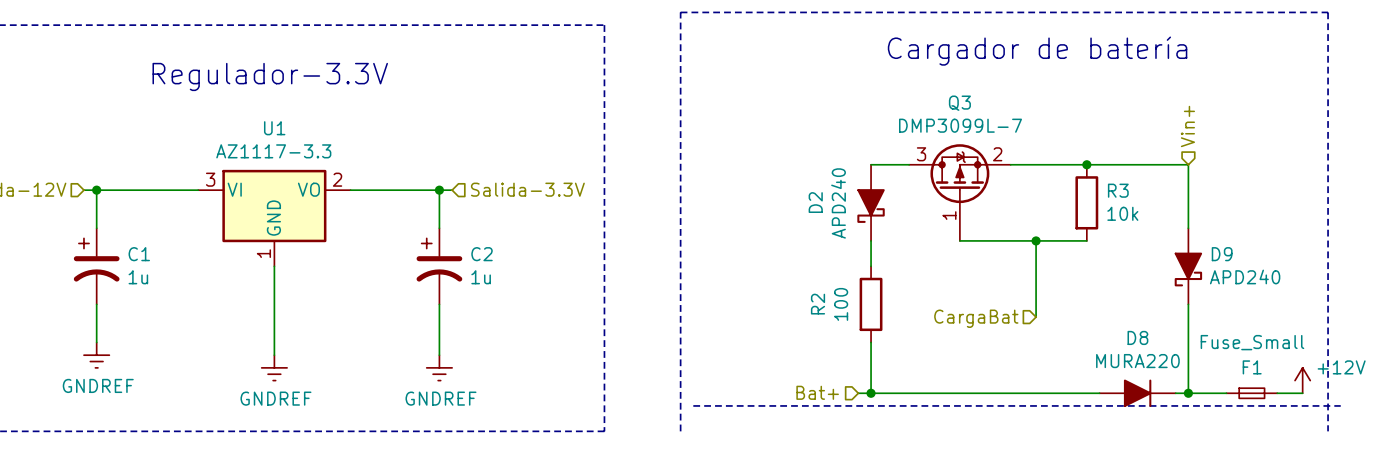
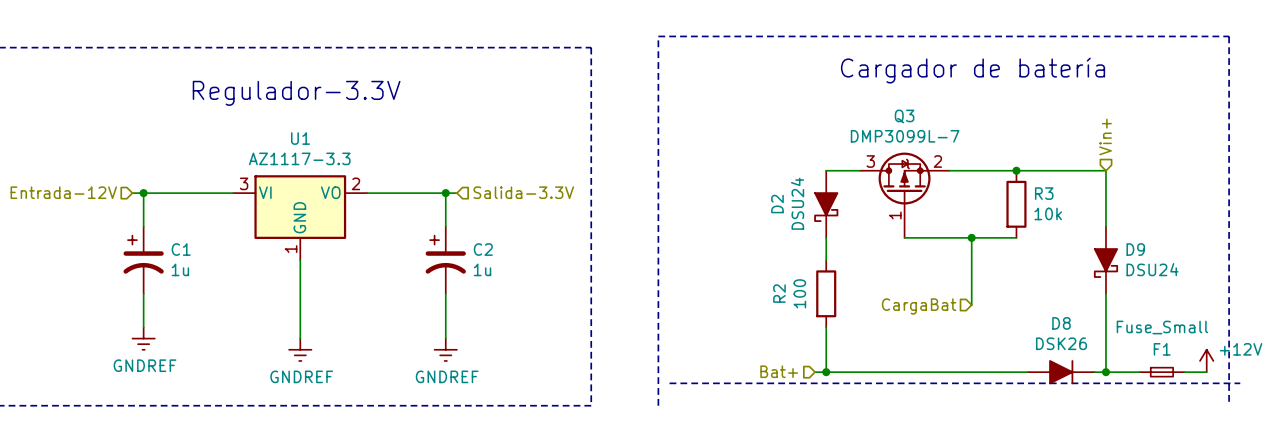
D2 value: APD240 (838, 203) -> DSU24 (797, 203)
D9 value: APD240 (1245, 276) -> DSU24 (1152, 269)
D8 value: MURA220 (1137, 361) -> DSK26 (1061, 343)

